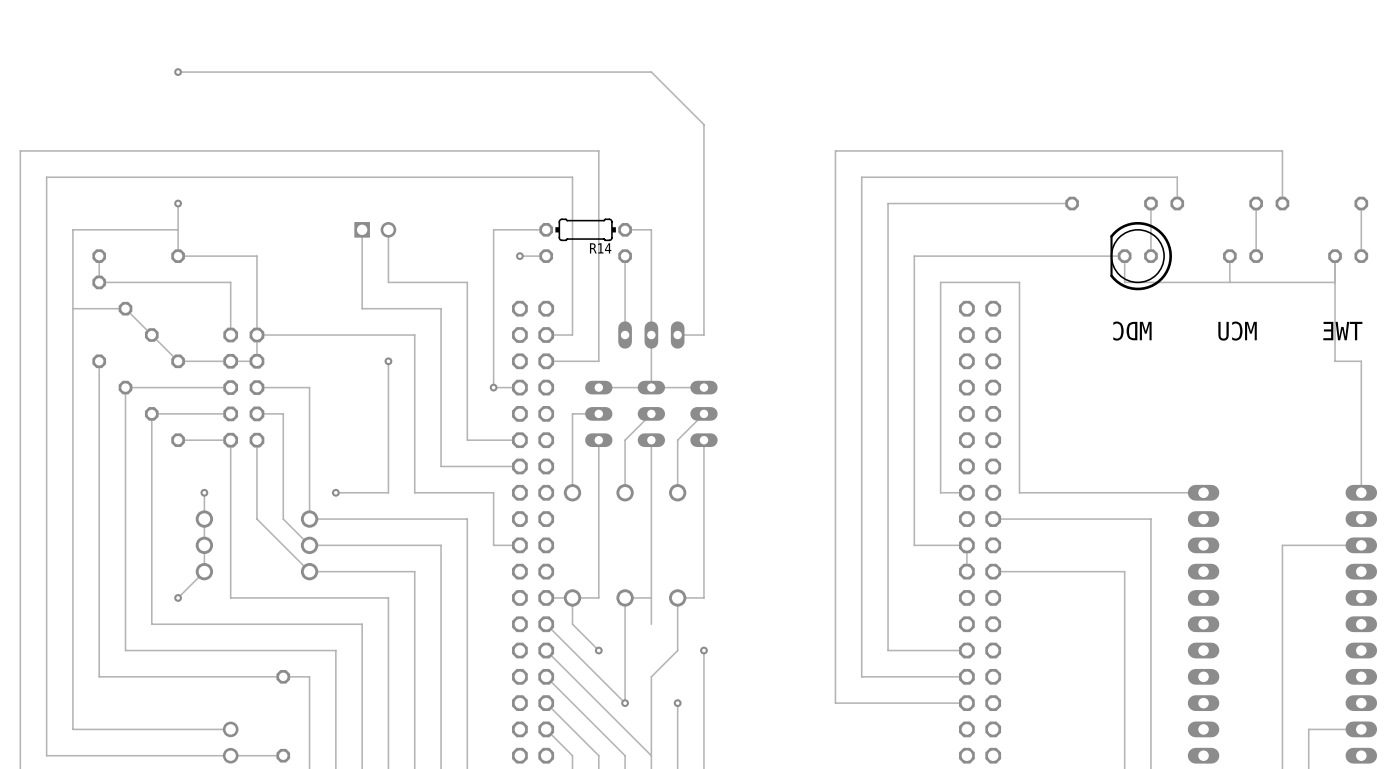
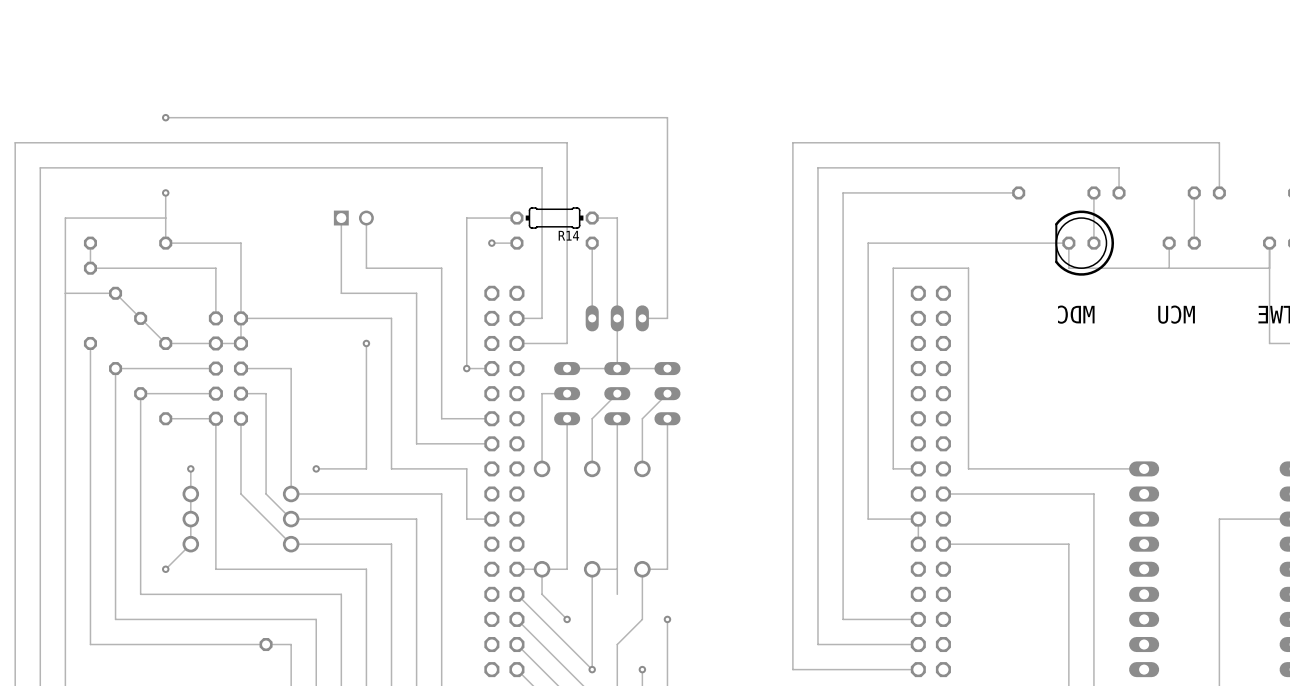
track: (178, 72) (651, 72) (703, 124) -> (165, 117) (667, 117)
via position: (178, 72) -> (165, 117)

